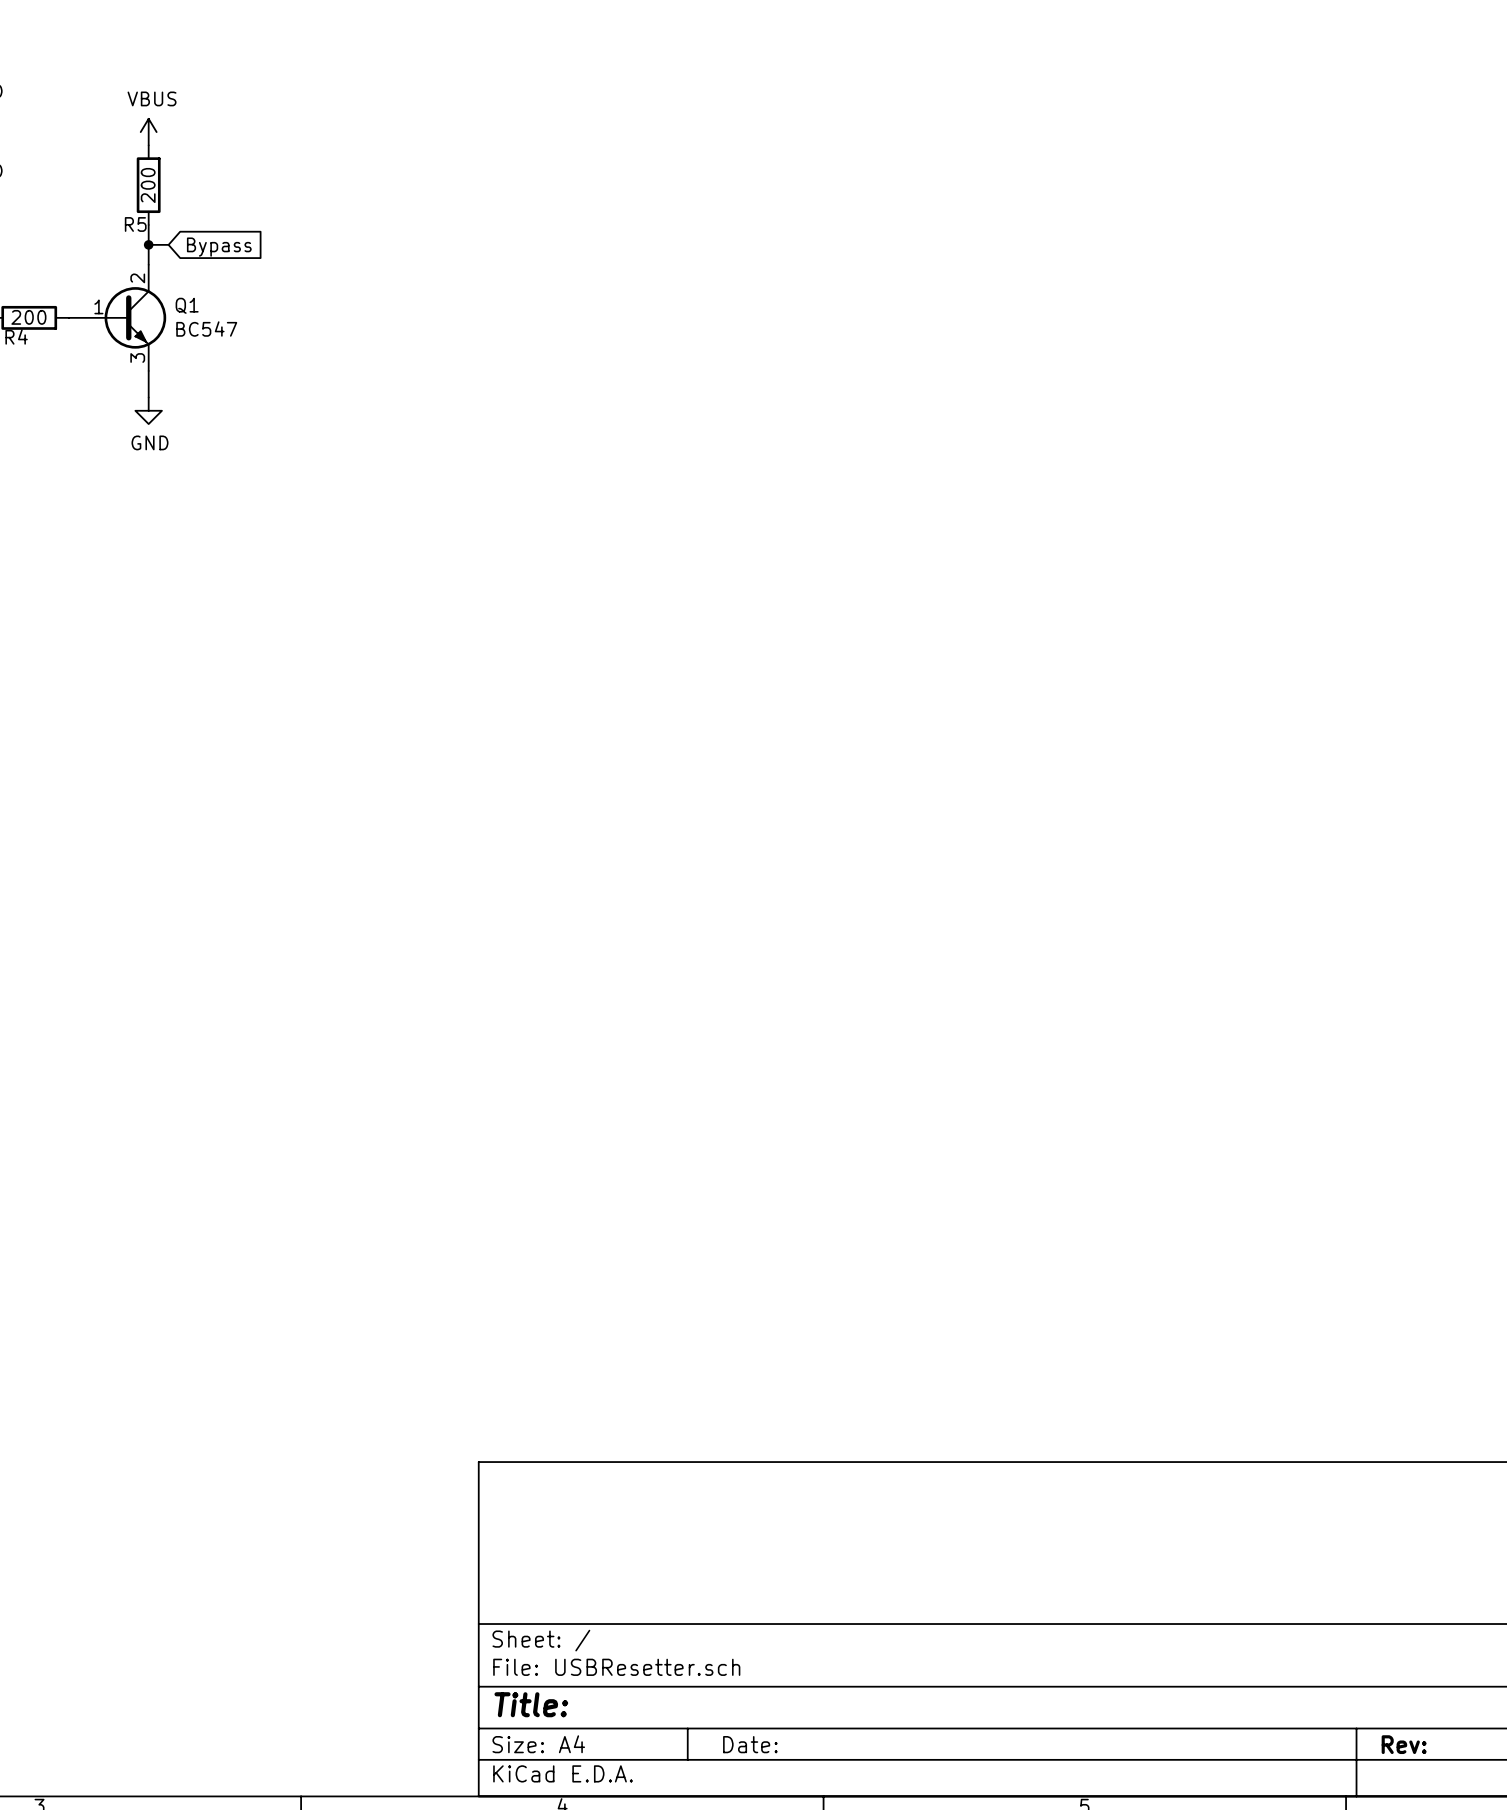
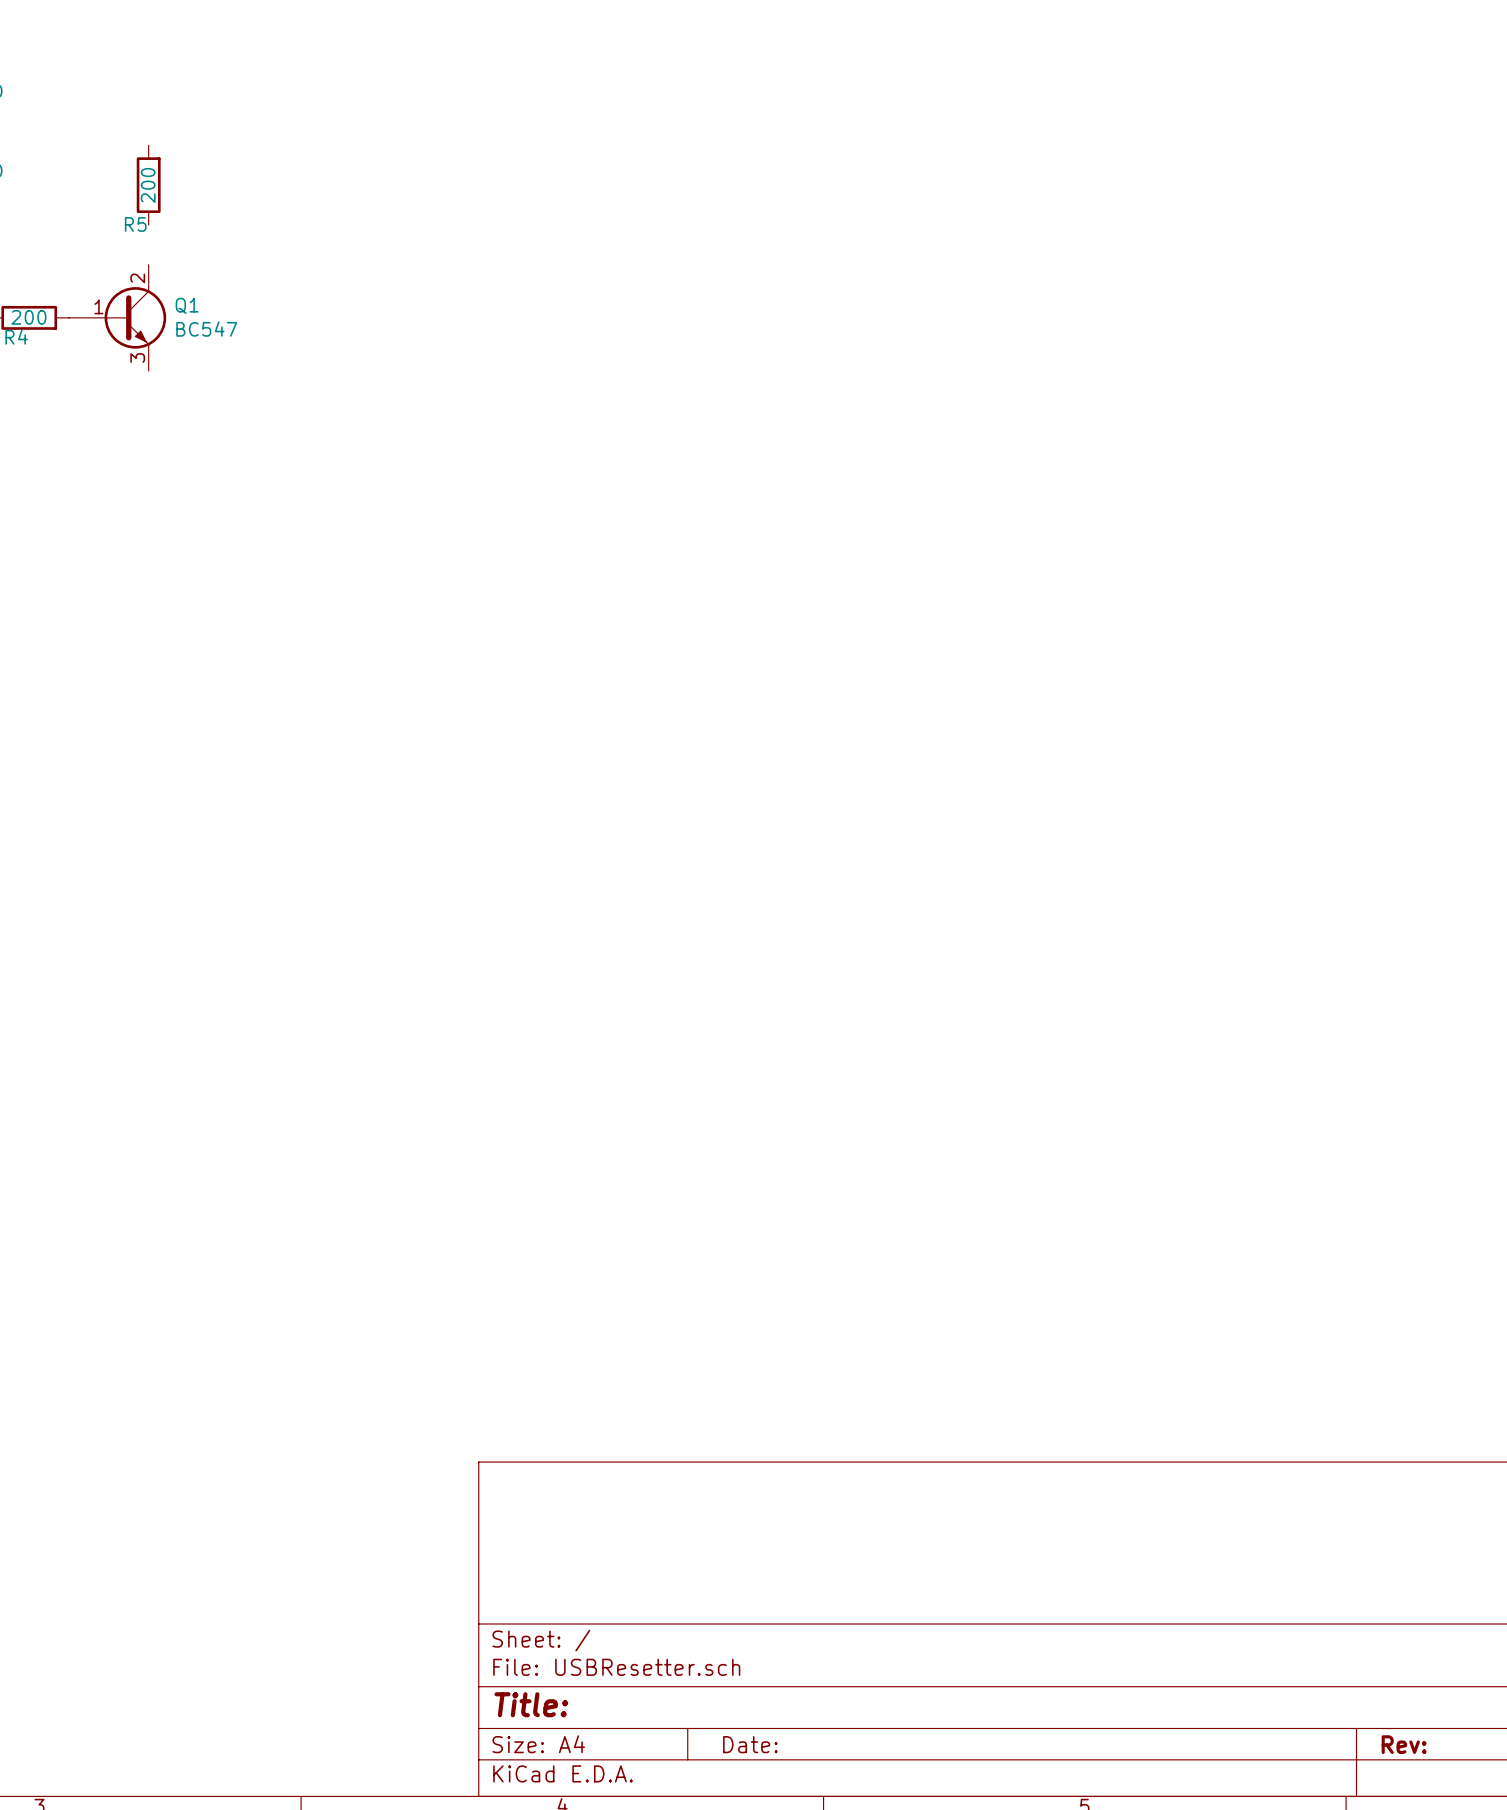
power symbol: VBUS (148, 132) -> none
wire: (148, 224) (148, 264) -> none
wire: (148, 244) (168, 244) -> none
junction: (148, 244) -> none
global label: Bypass (219, 247) -> none
wire: (148, 370) (148, 397) -> none
power symbol: GND (148, 410) -> none

